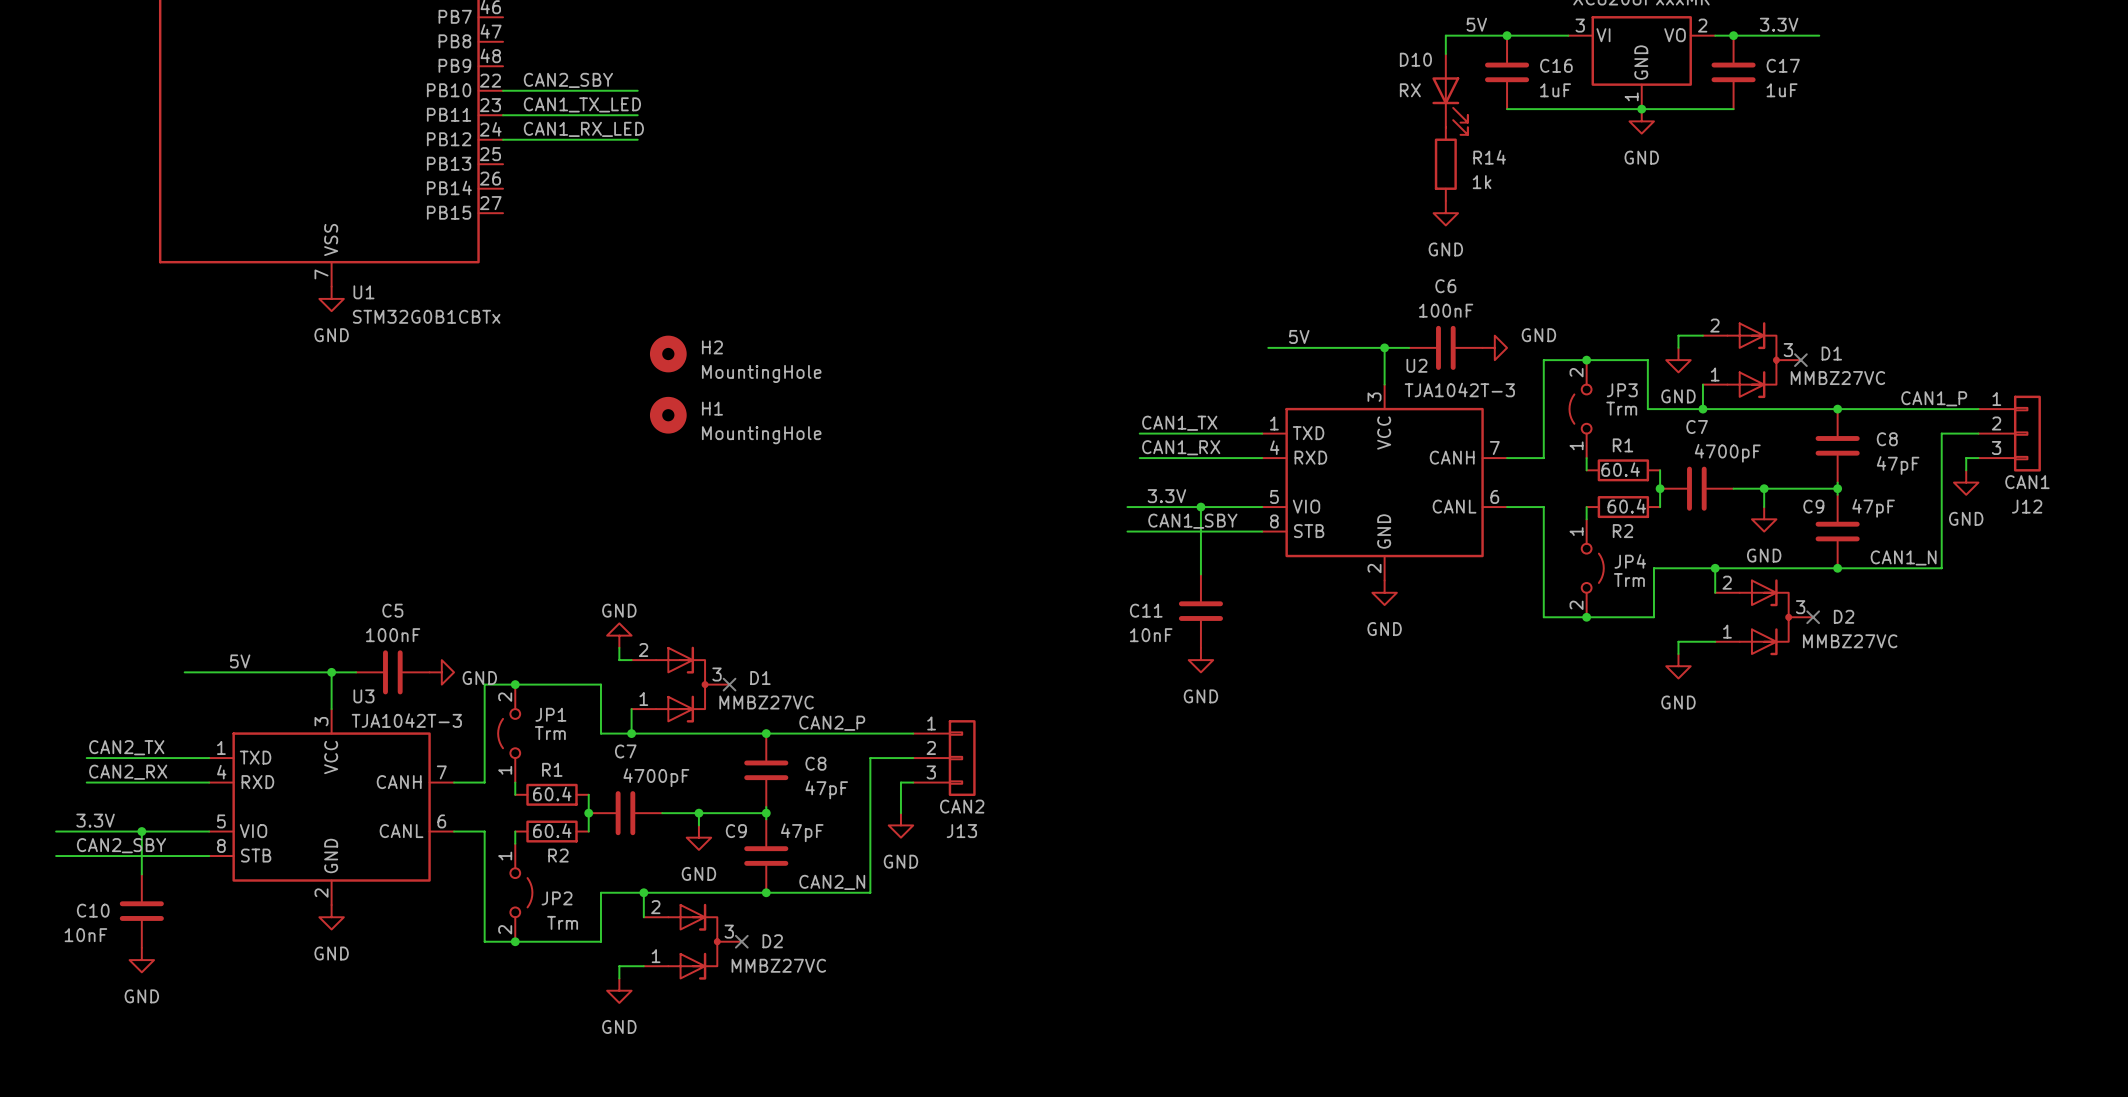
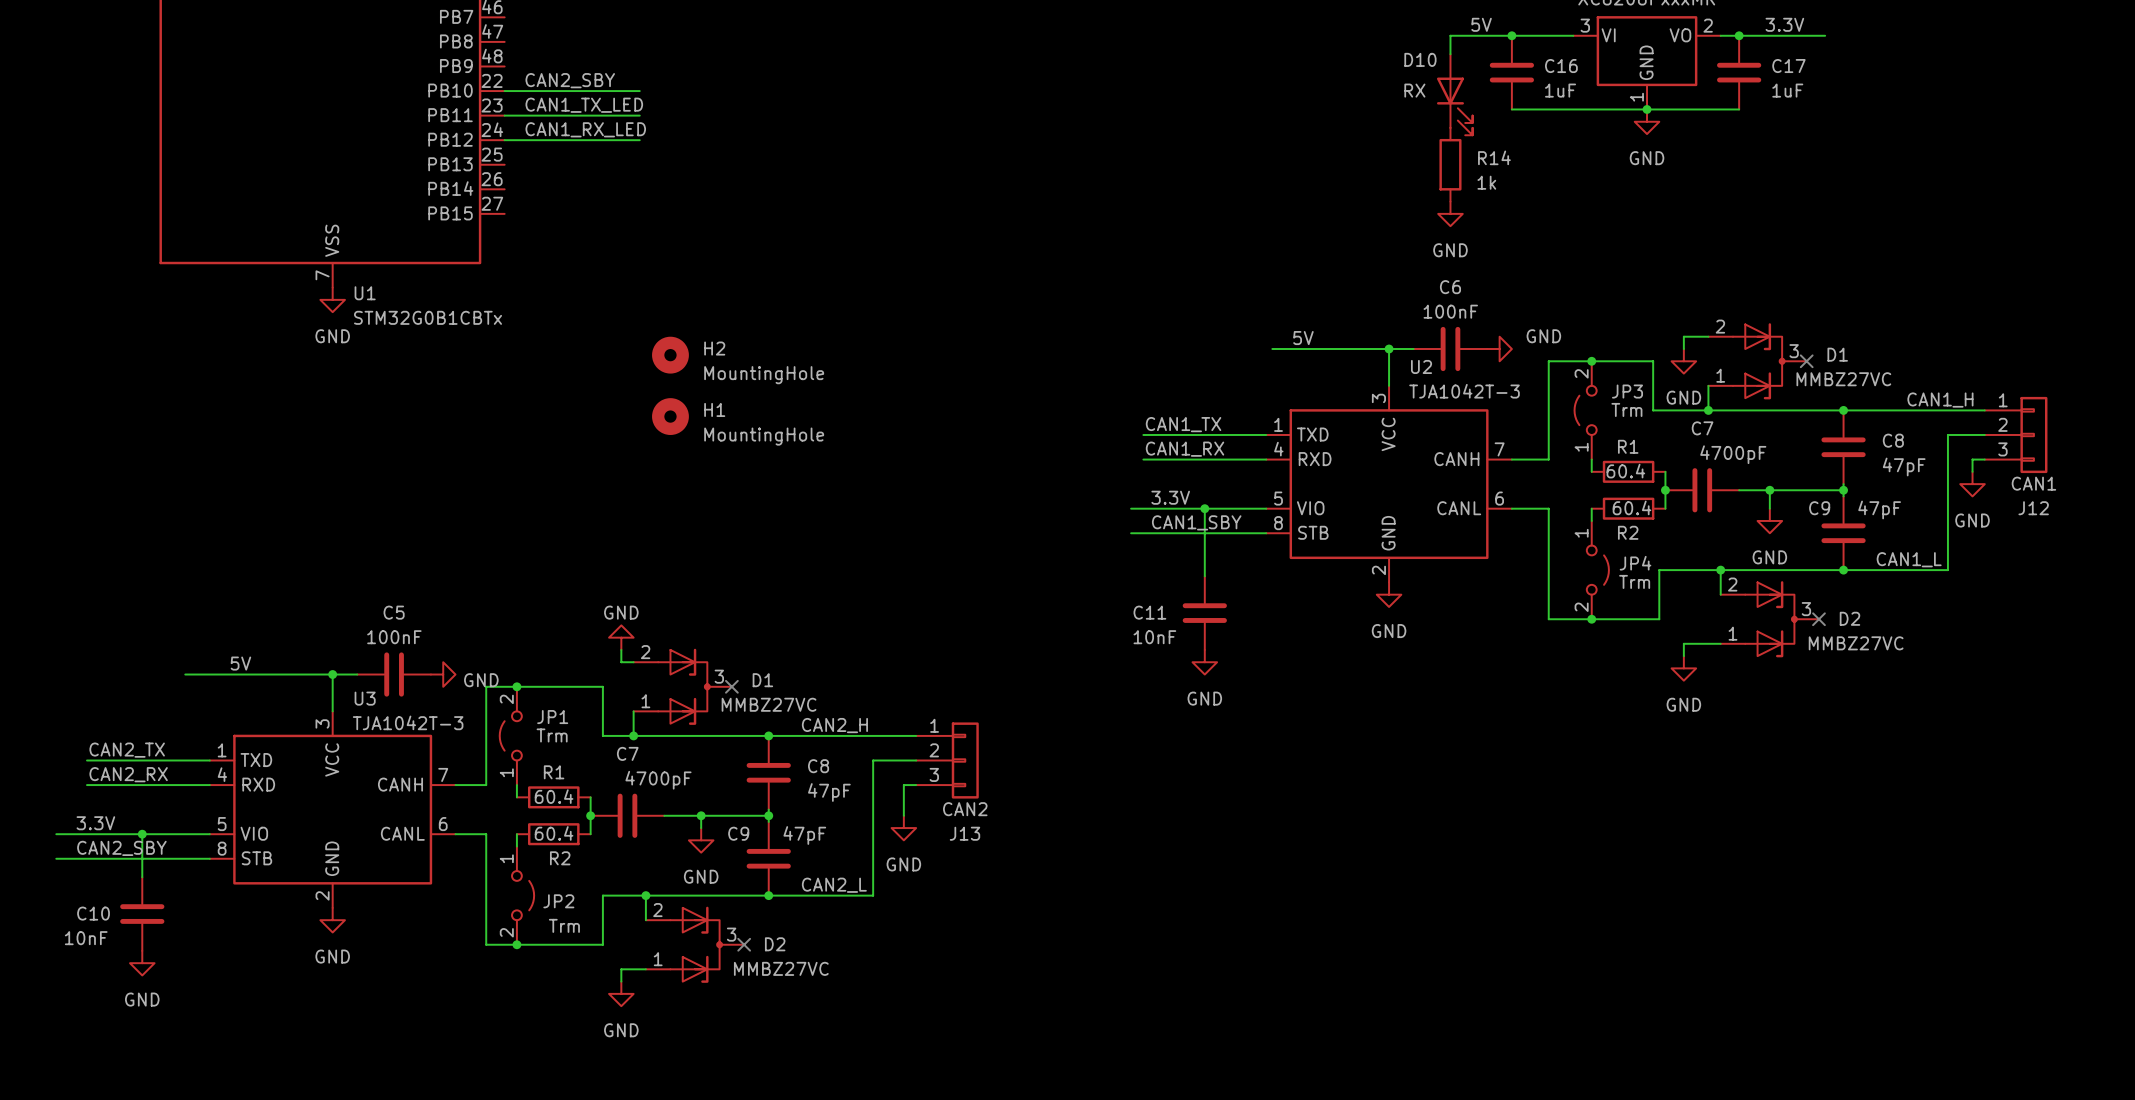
label: CAN1_P (1934, 398) -> CAN1_H (1940, 400)
label: CAN1_N (1903, 557) -> CAN1_L (1909, 559)
label: CAN2_P (832, 723) -> CAN2_H (834, 725)
label: CAN2_N (832, 882) -> CAN2_L (834, 885)

